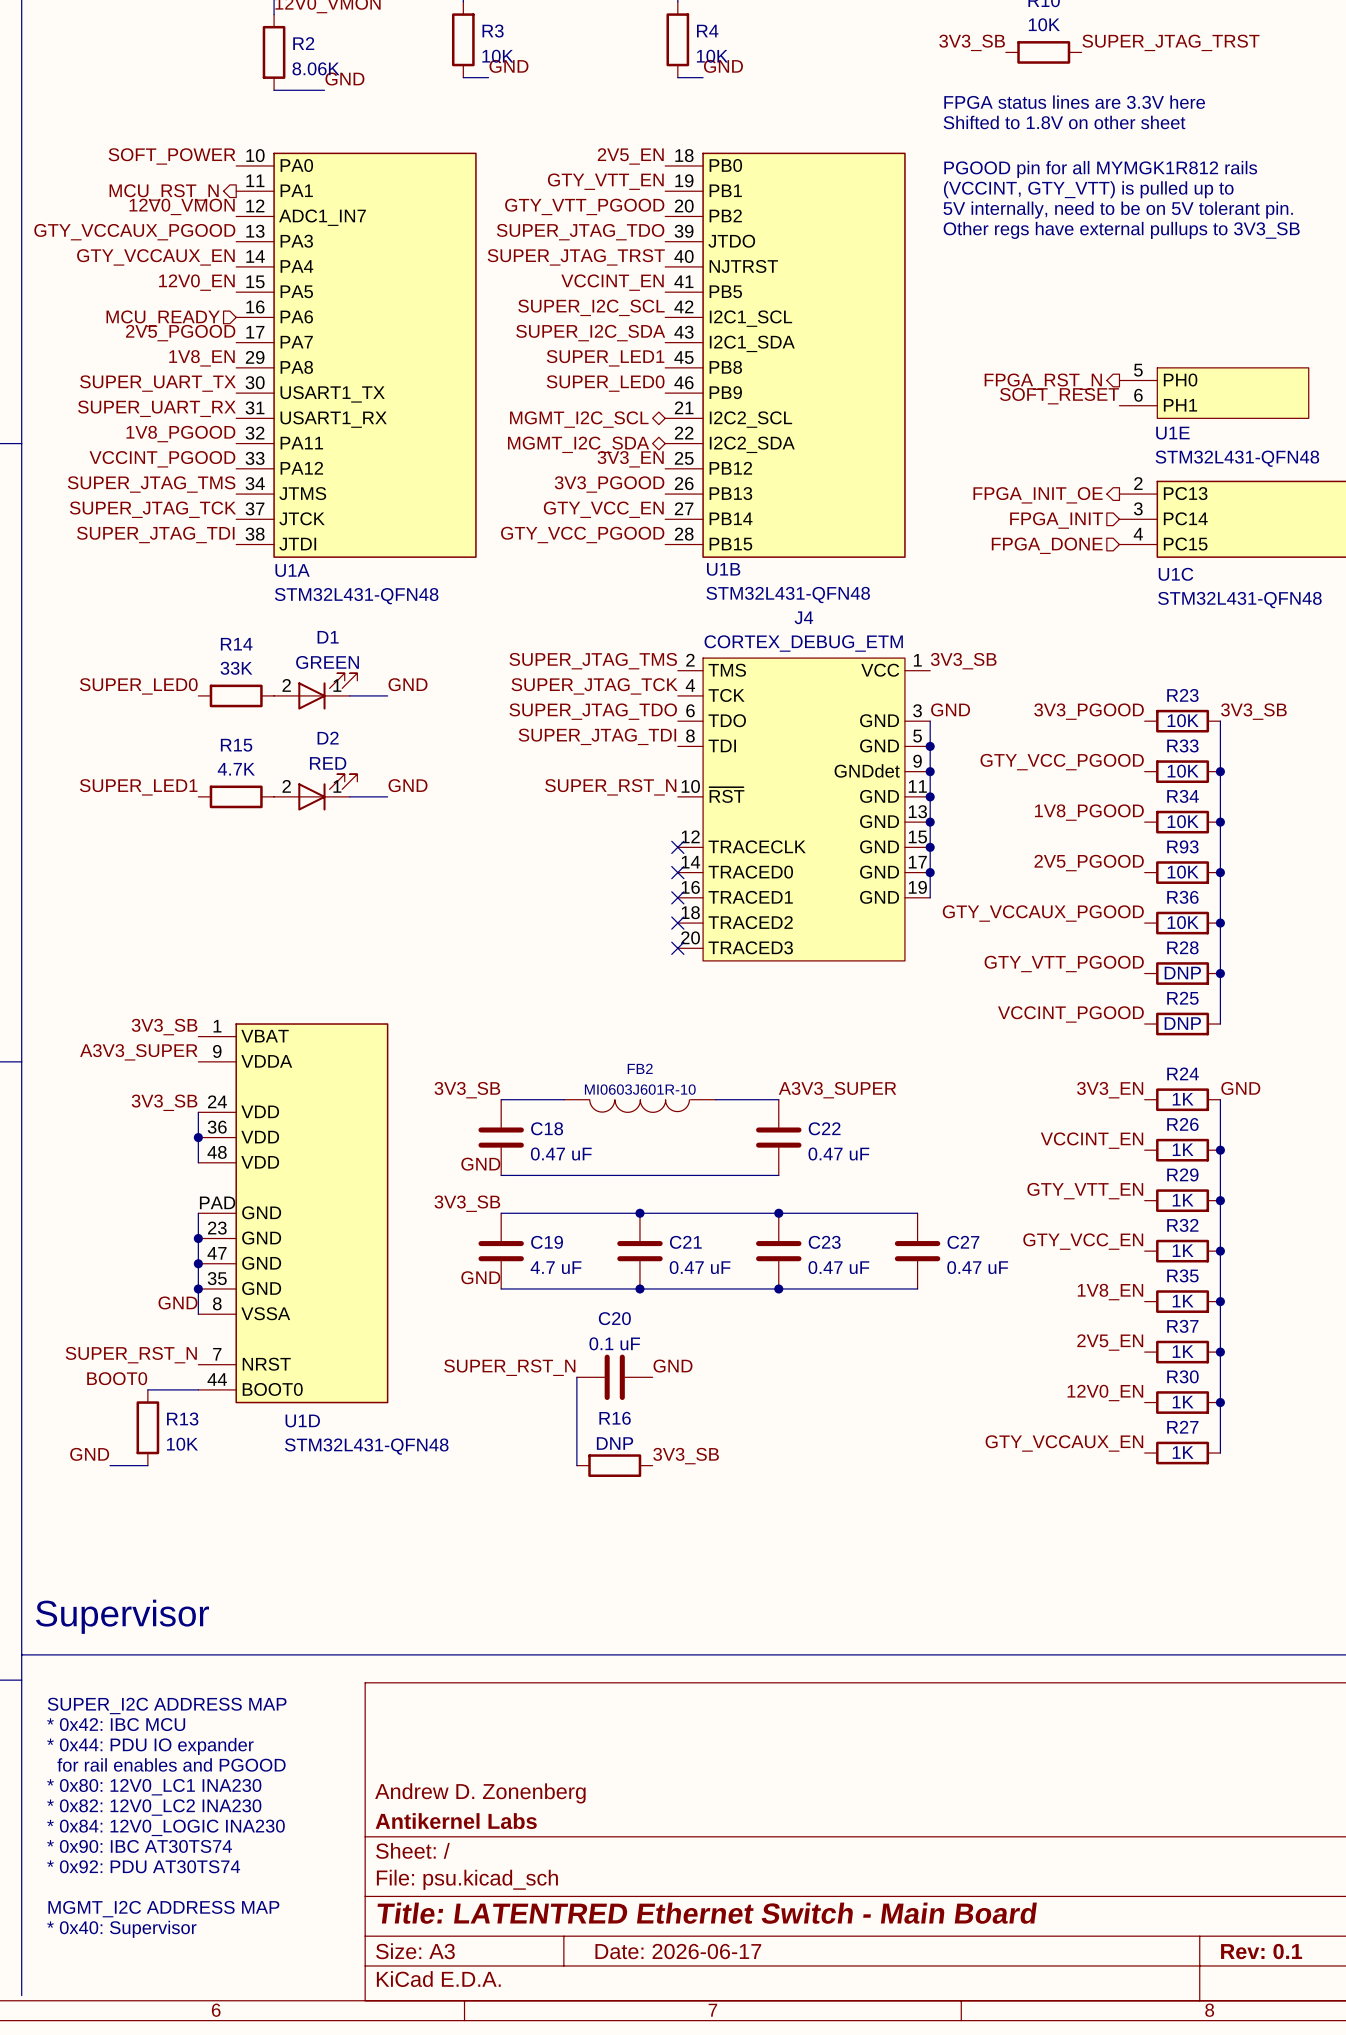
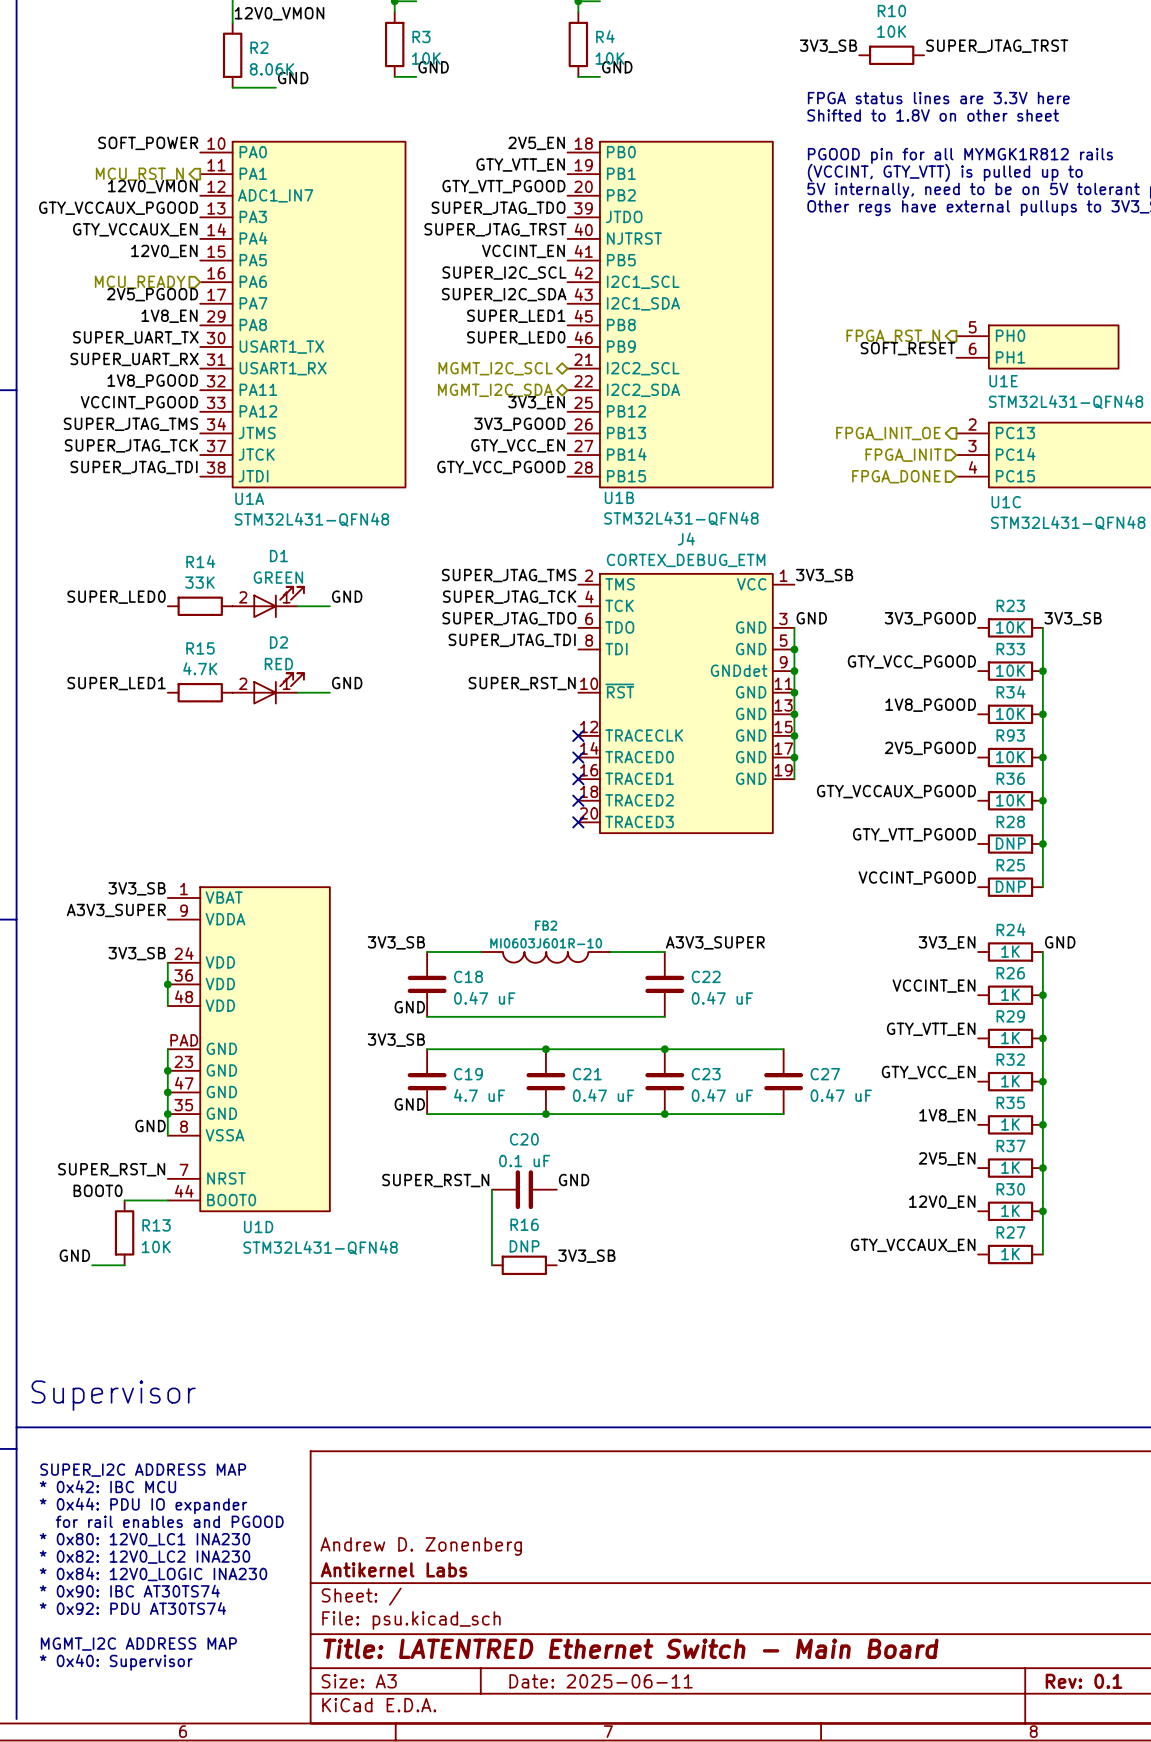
title block: Date: 2026-06-17 (678, 1951) -> Date: 2025-06-11 (601, 1681)

